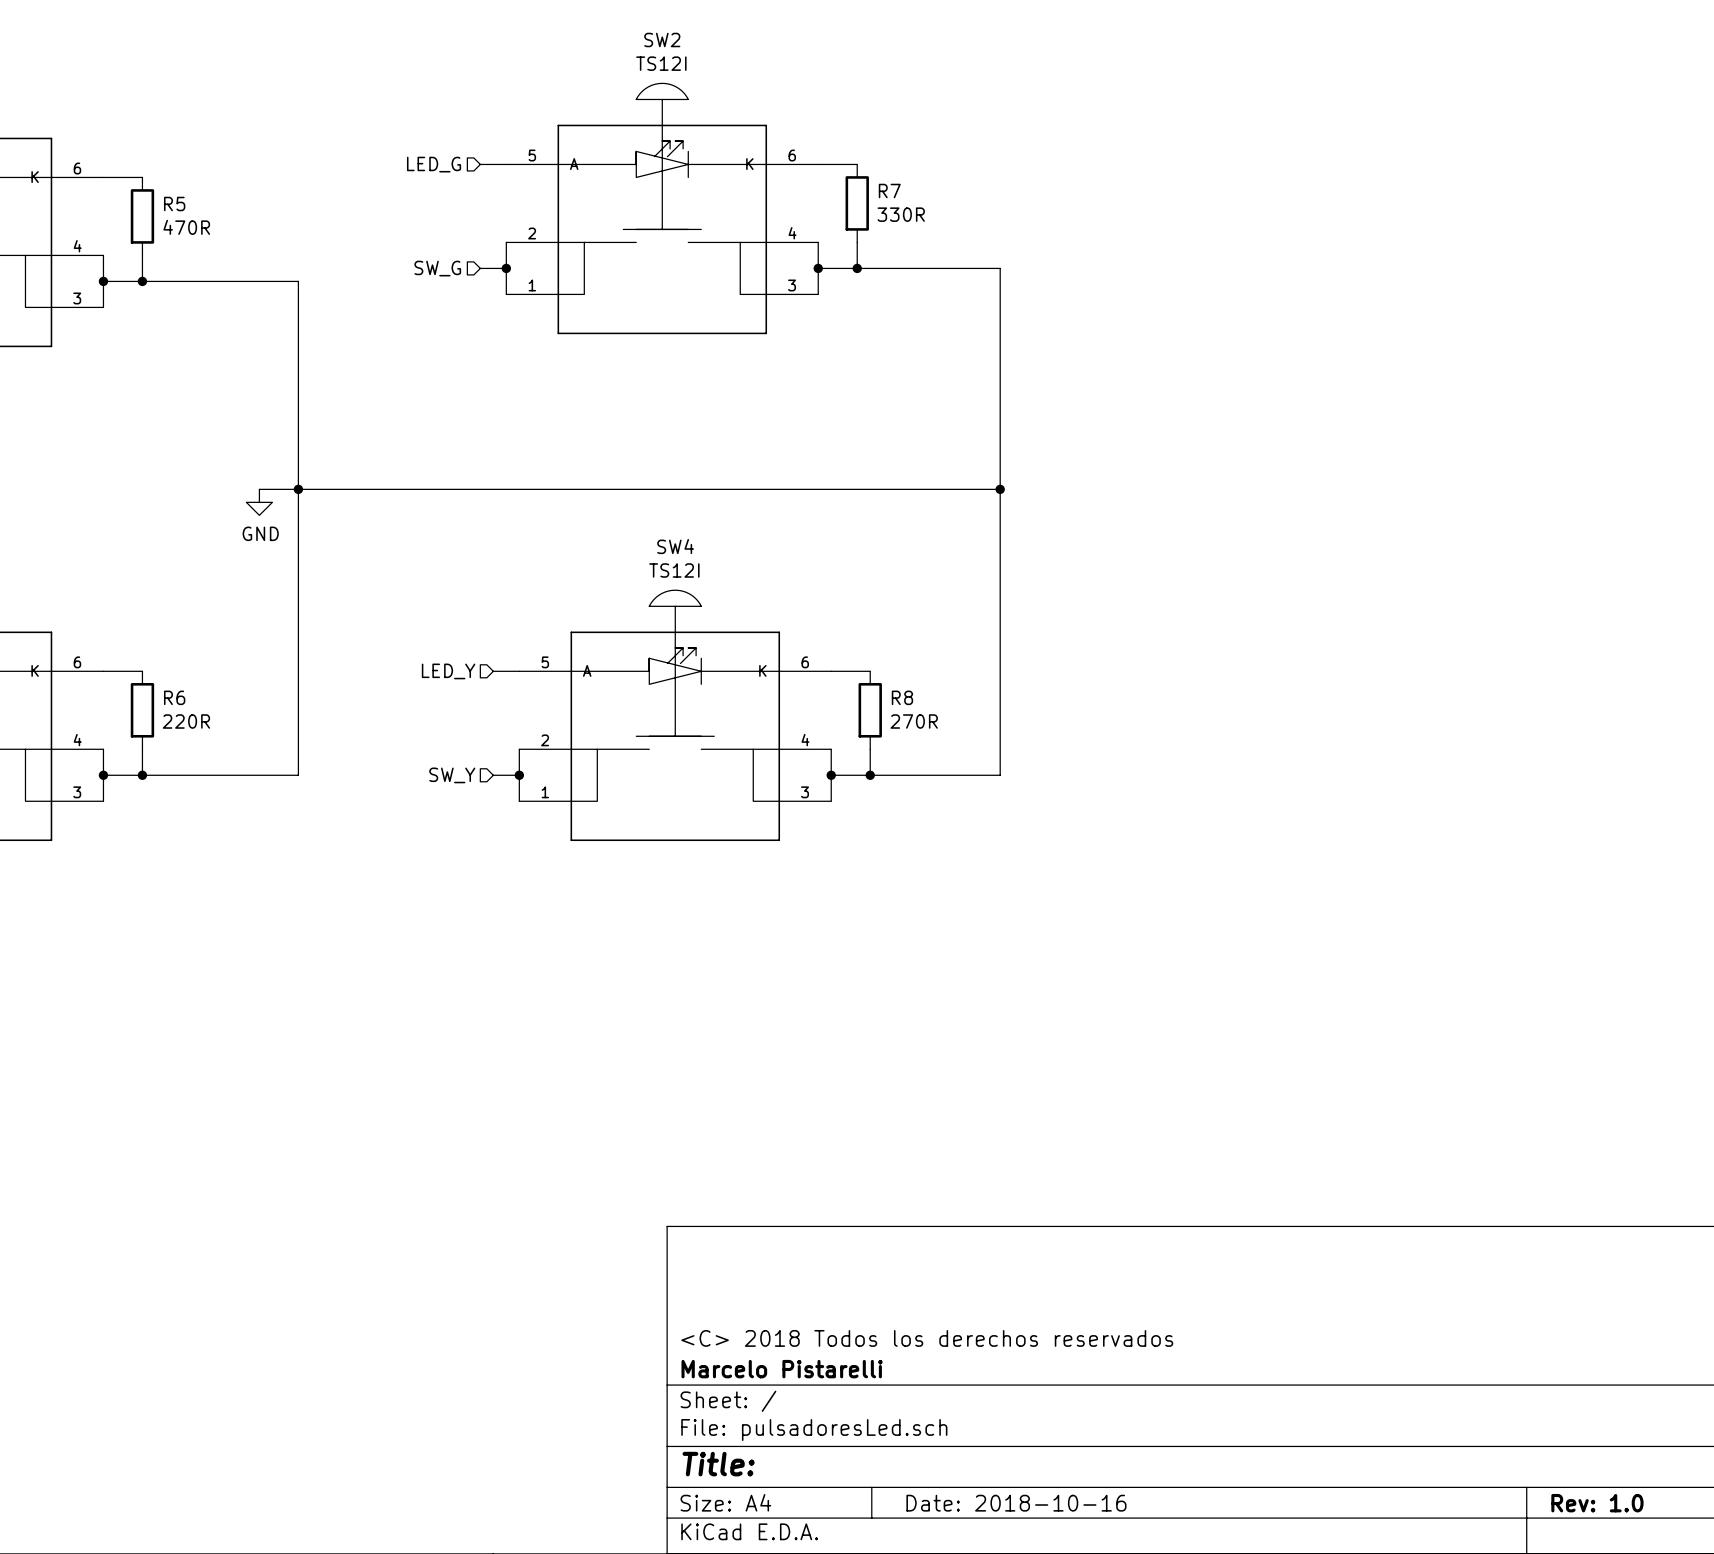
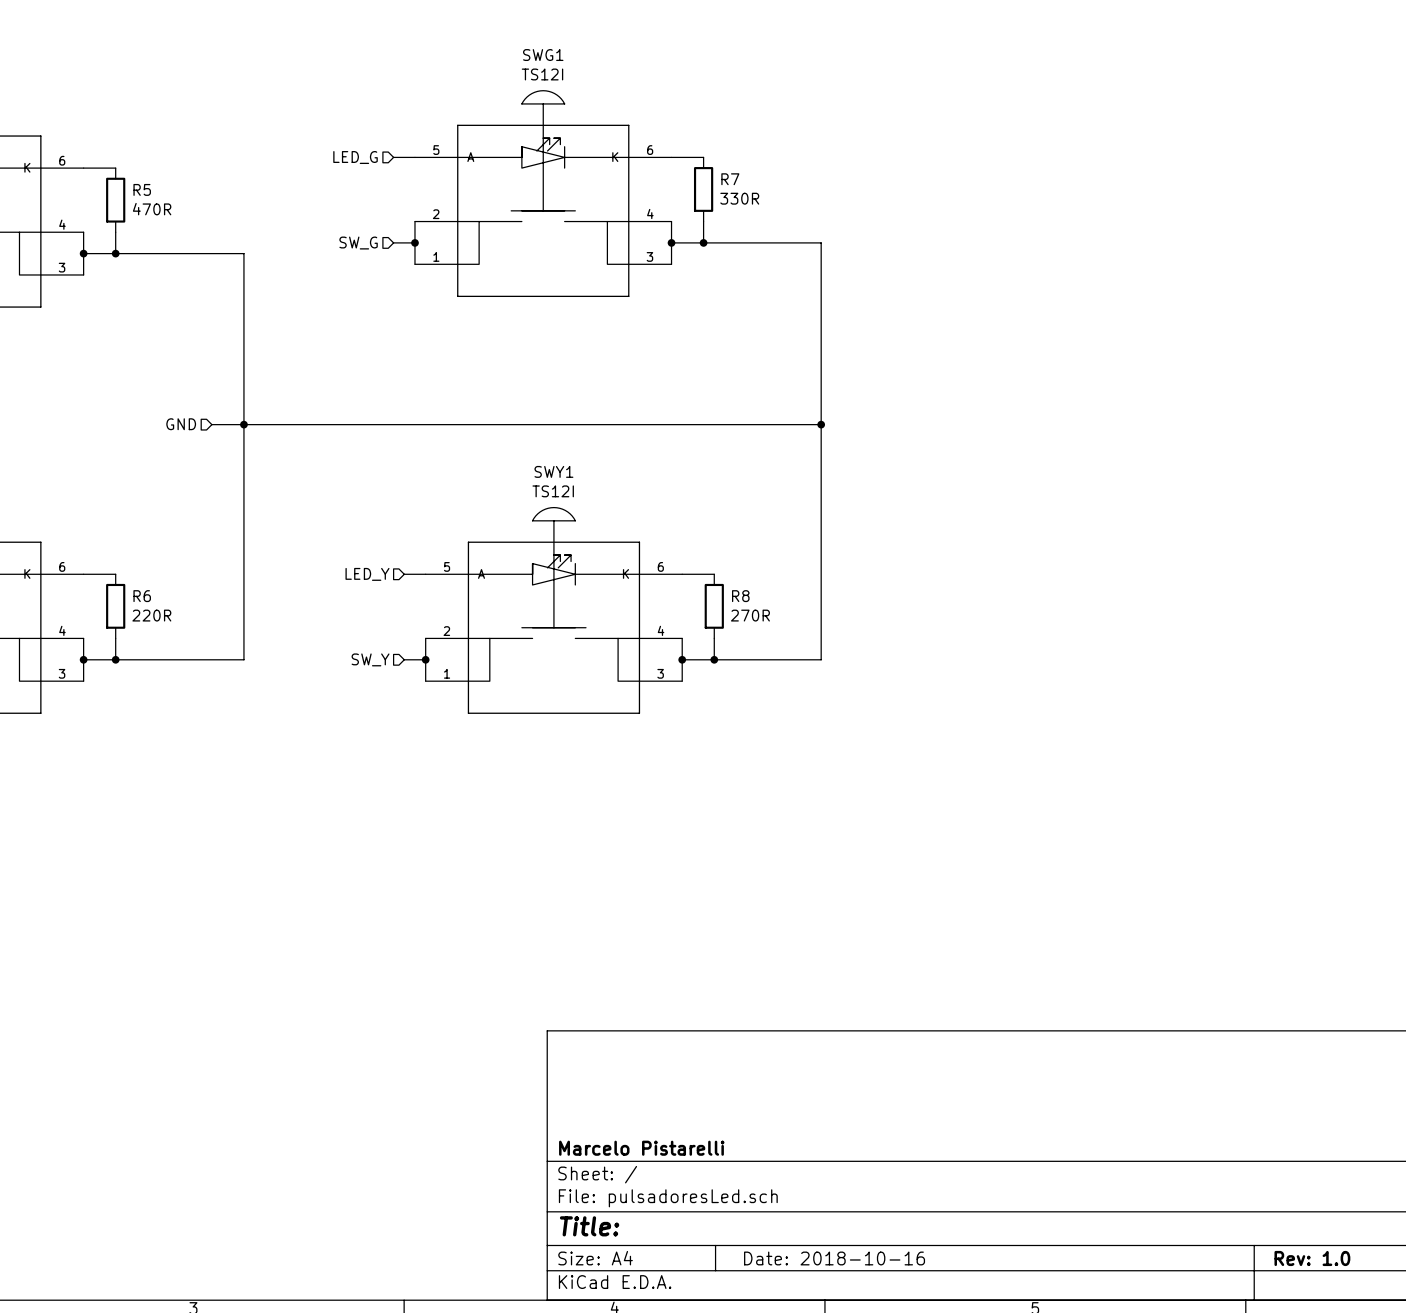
SW2 name: SW2 (662, 39) -> SWG1 (543, 55)
hierarchical label: none -> GND (181, 424)
power symbol: GND (259, 502) -> none
SW4 name: SW4 (675, 546) -> SWY1 (553, 471)
title block: <C> 2018 Todos los derechos reservados (927, 1338) -> none

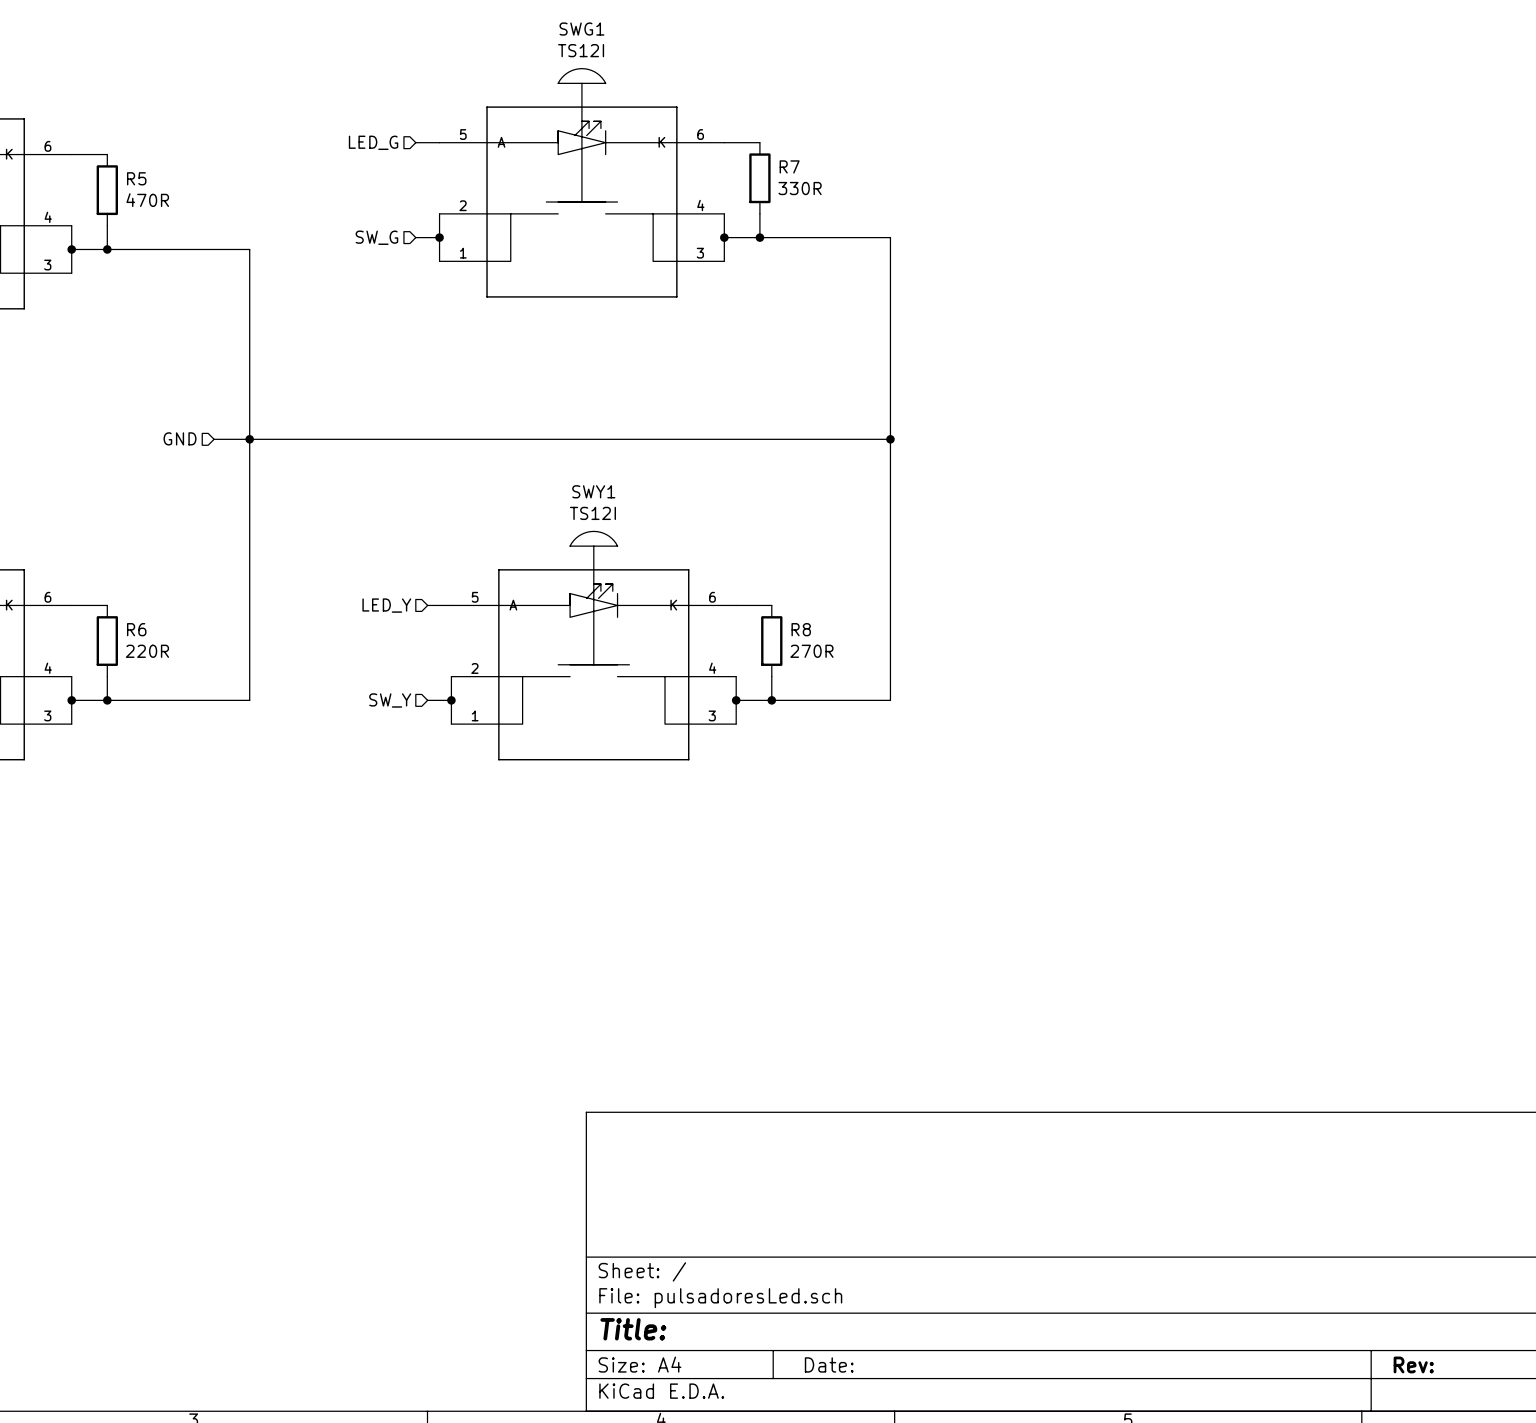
title block: Marcelo Pistarelli (641, 1148) -> none
title block: Date: 2018-10-16 (834, 1258) -> Date: (829, 1364)
title block: Rev: 1.0 (1312, 1258) -> Rev: (1413, 1364)

